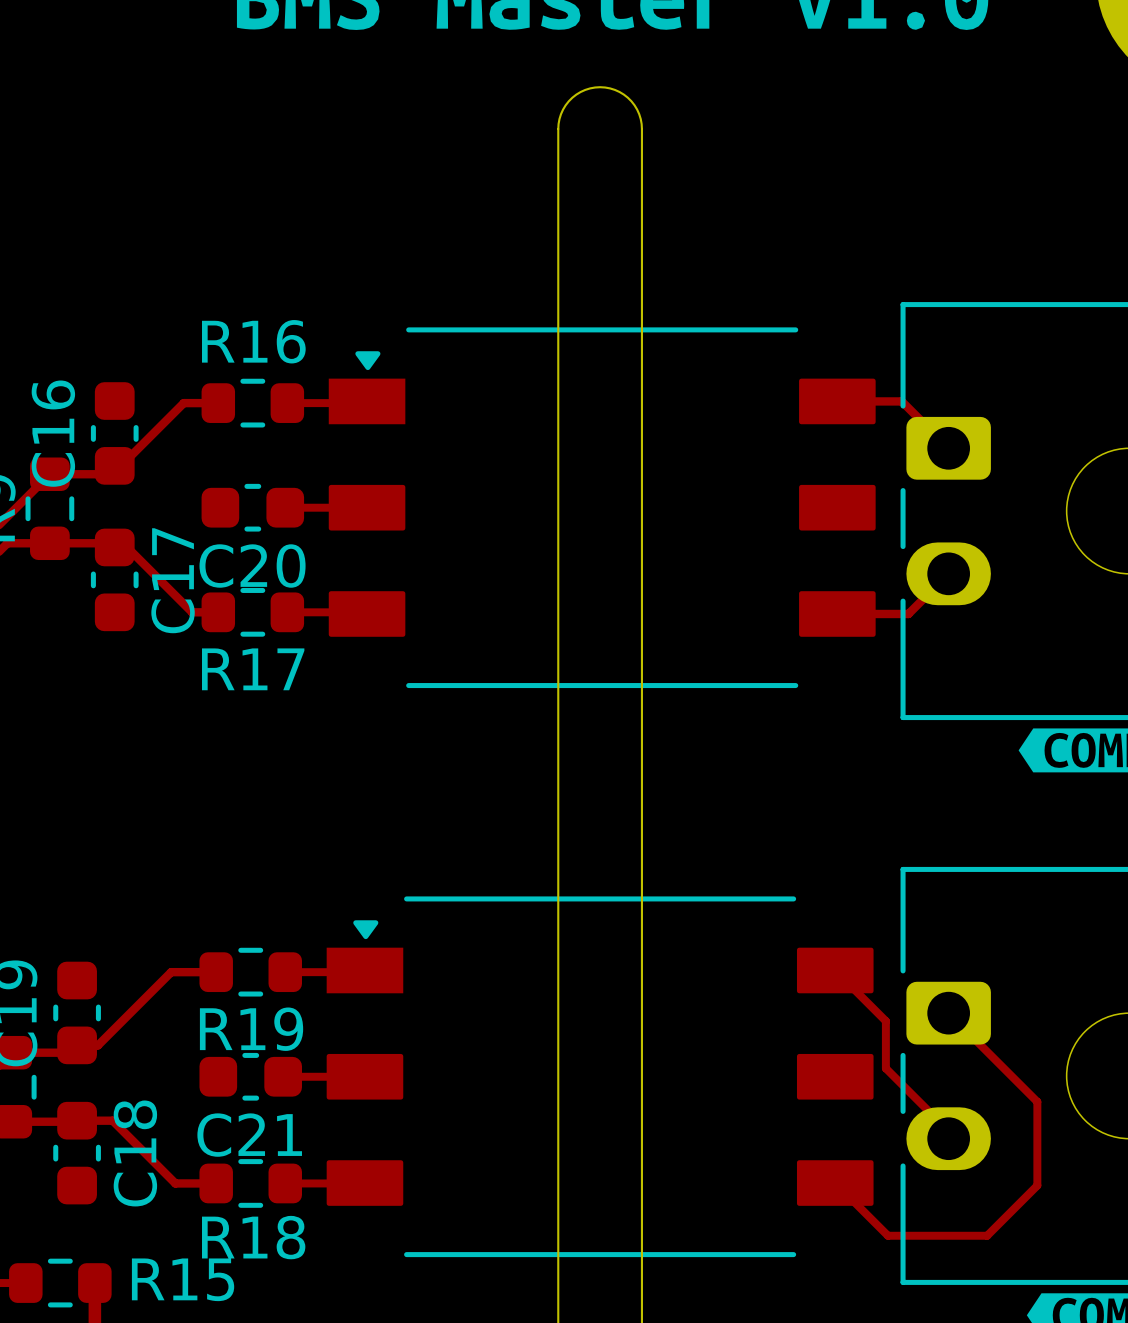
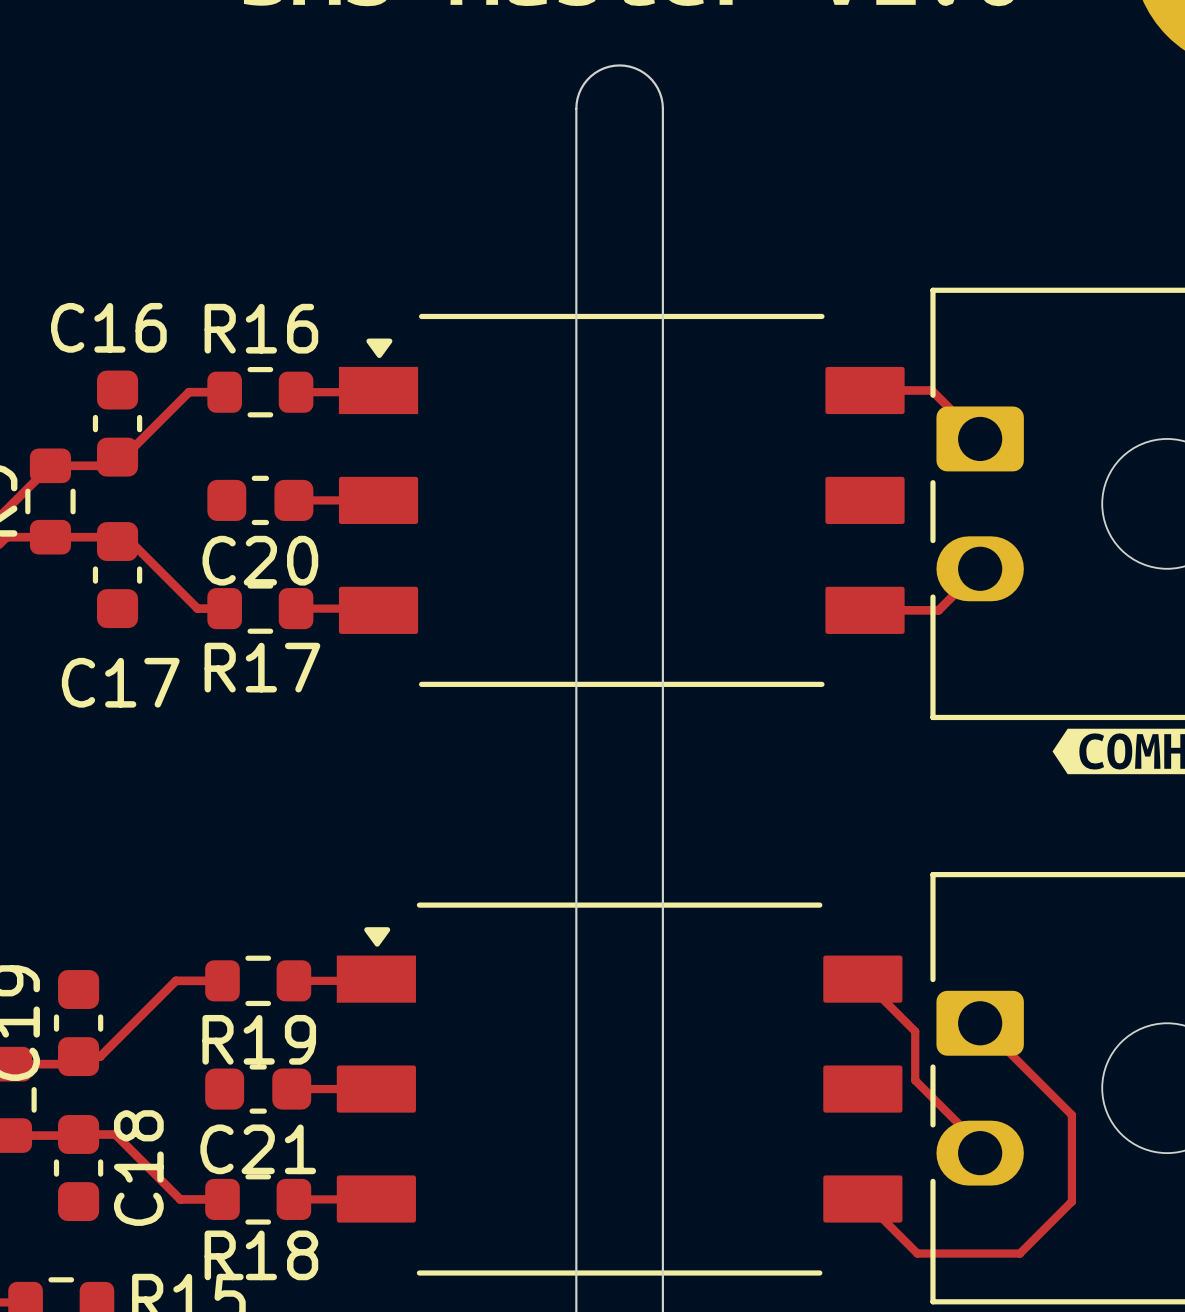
C16 name rotation: 0° (53, 433) -> 90° clockwise (108, 327)
C17 name rotation: 0° (173, 580) -> 90° clockwise (120, 682)

